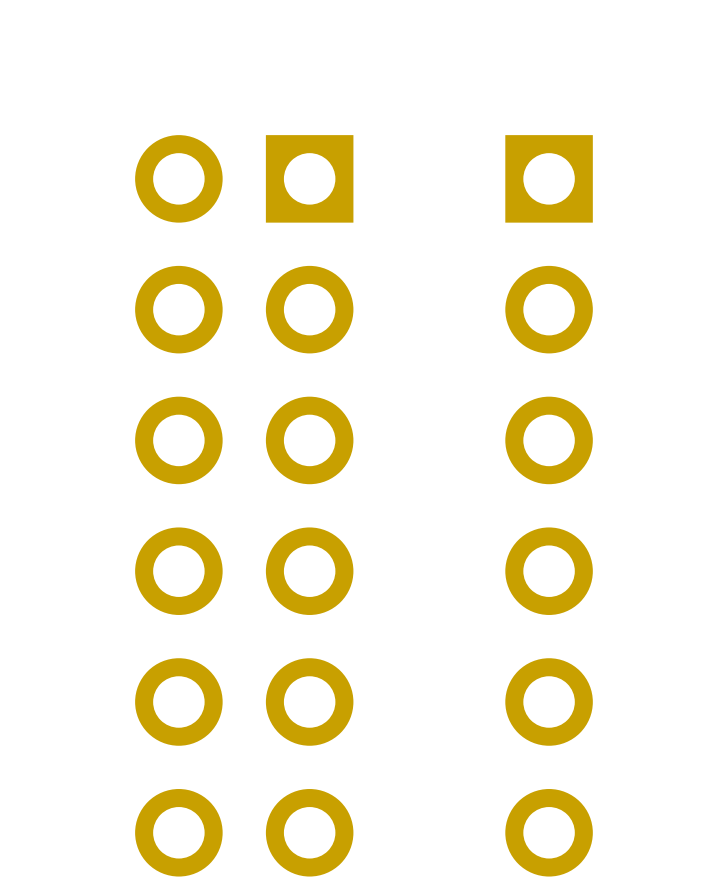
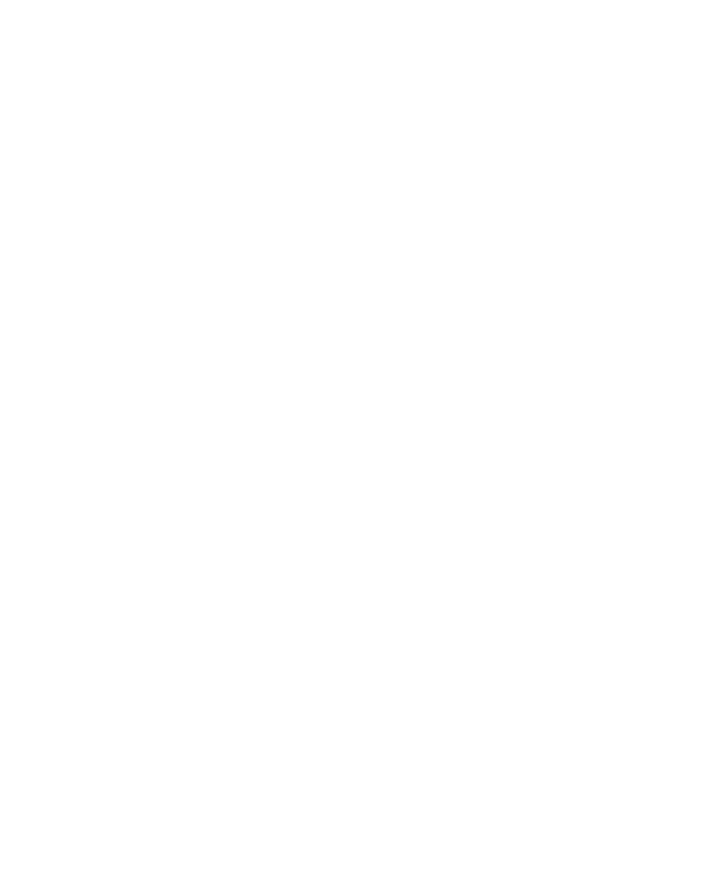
part: (244, 505) -> none
part: (549, 505) -> none

